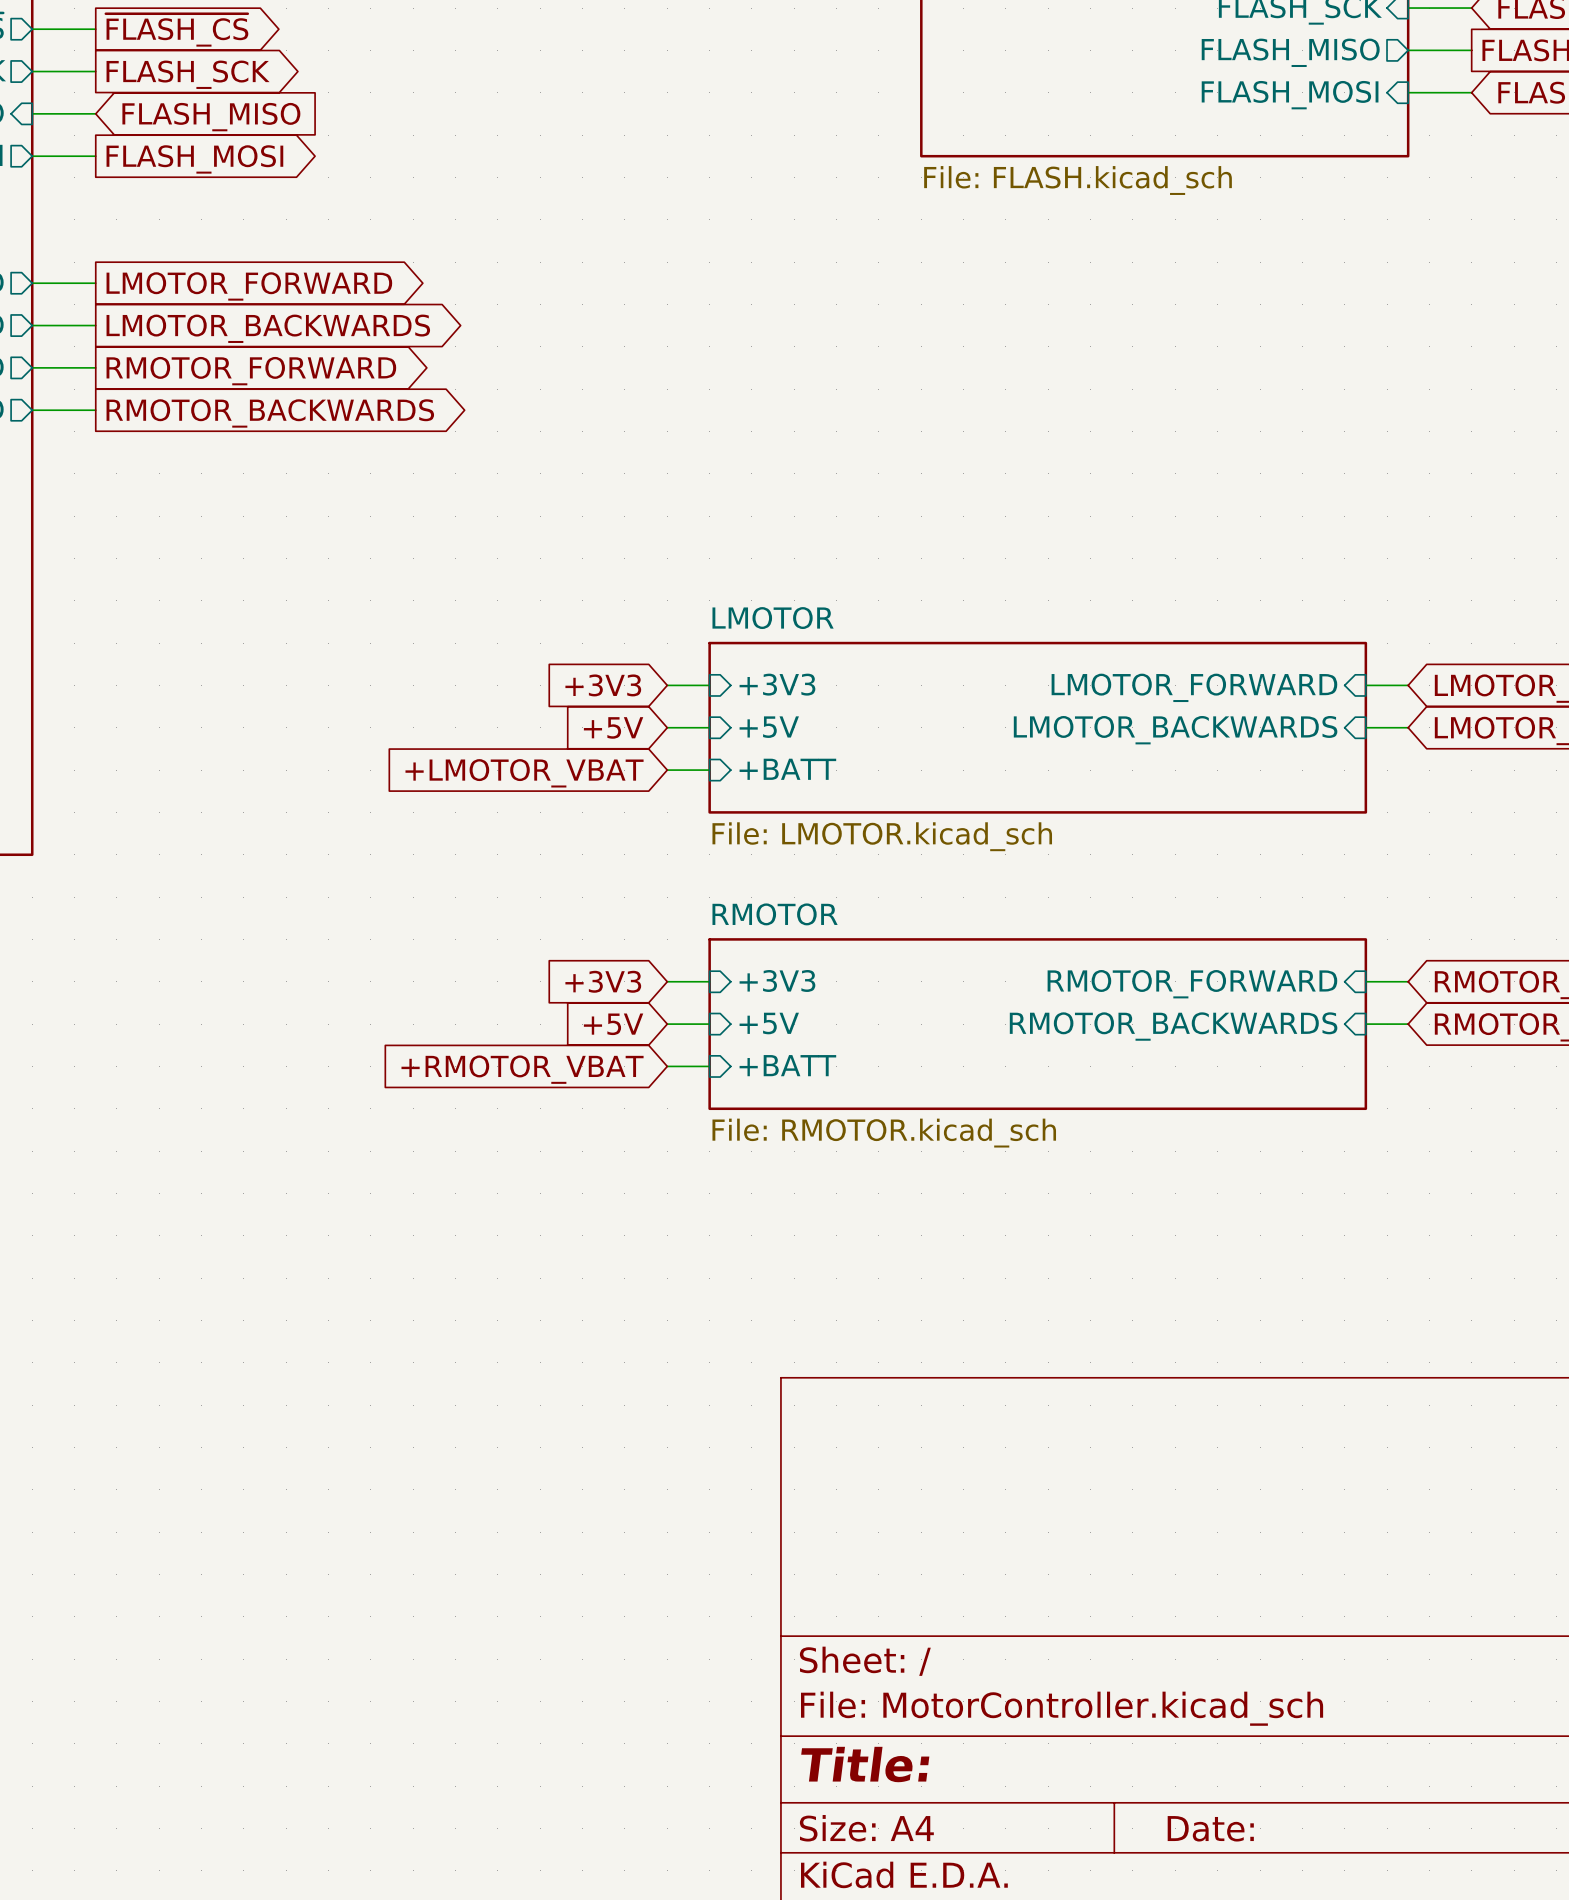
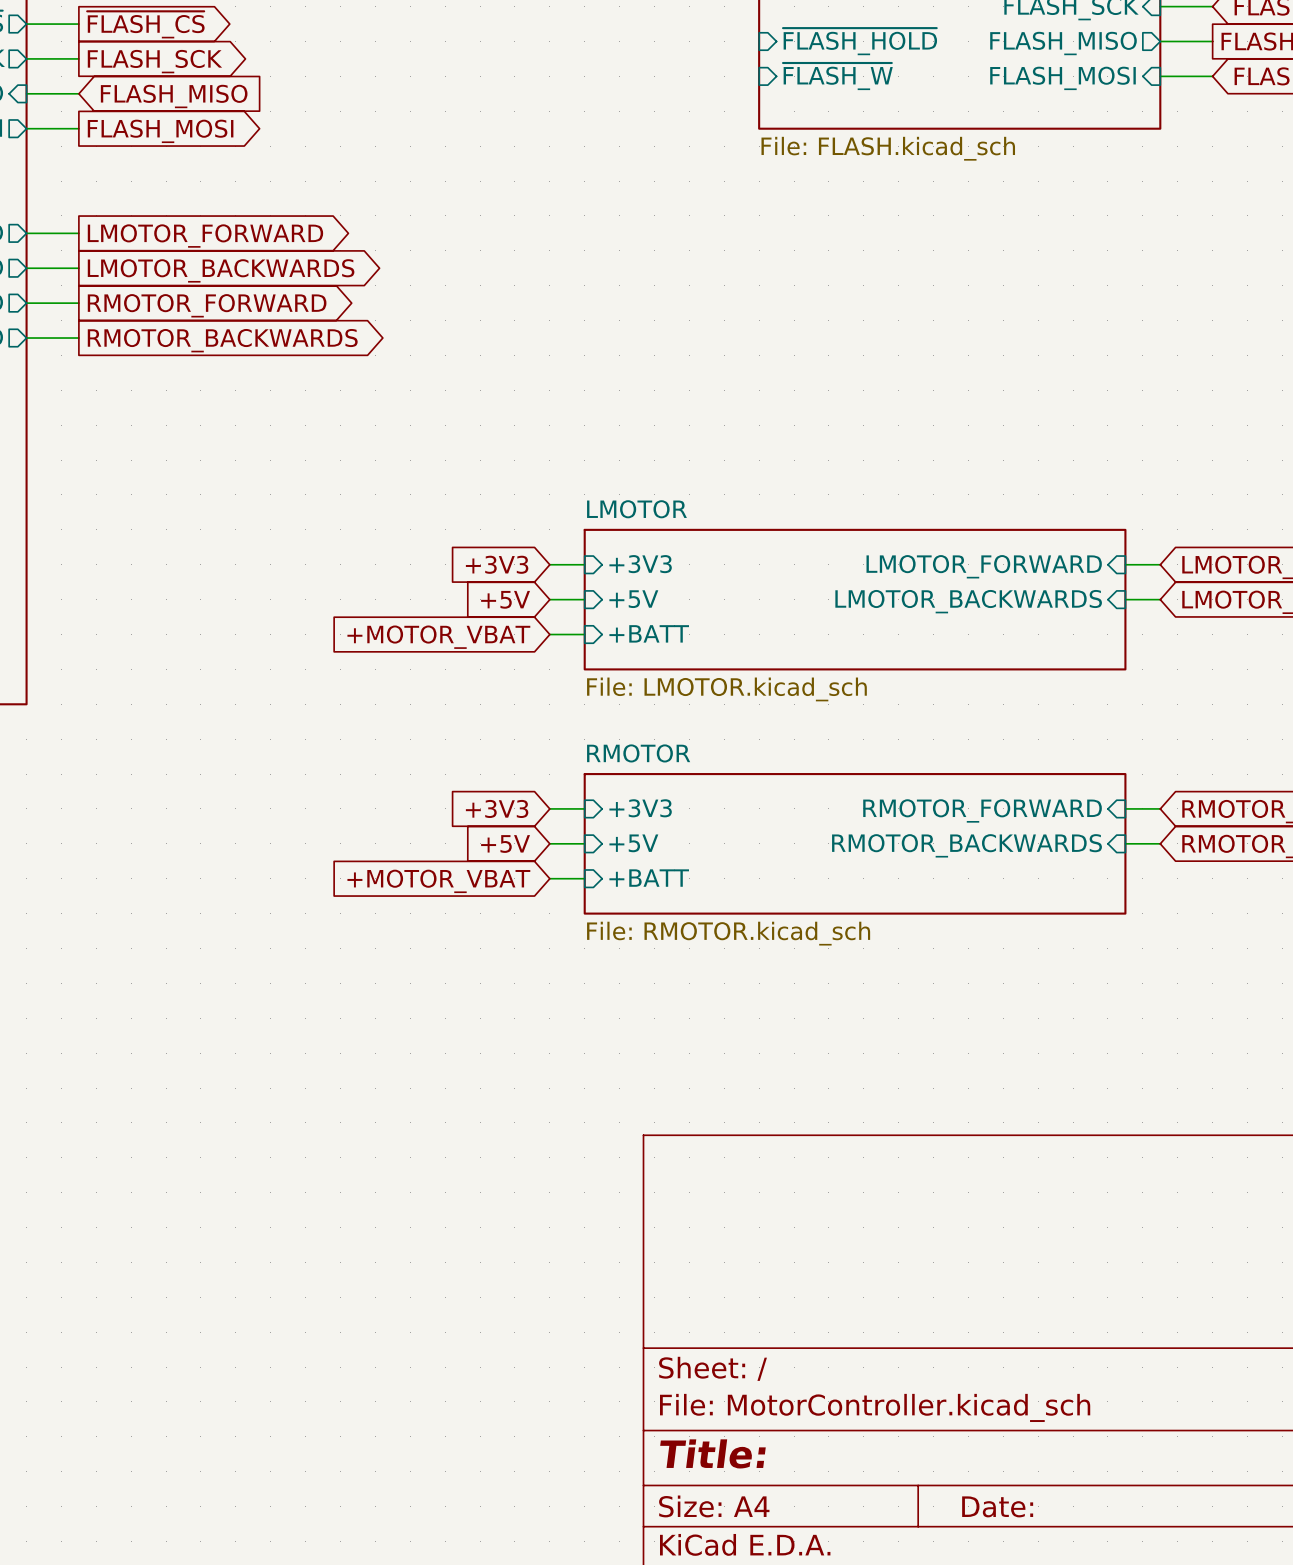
sheet pin: none -> ~{FLASH_HOLD} (860, 41)
sheet pin: none -> ~{FLASH_W} (837, 76)
global label: +LMOTOR_VBAT (524, 773) -> +MOTOR_VBAT (438, 637)
global label: +RMOTOR_VBAT (522, 1069) -> +MOTOR_VBAT (438, 881)

